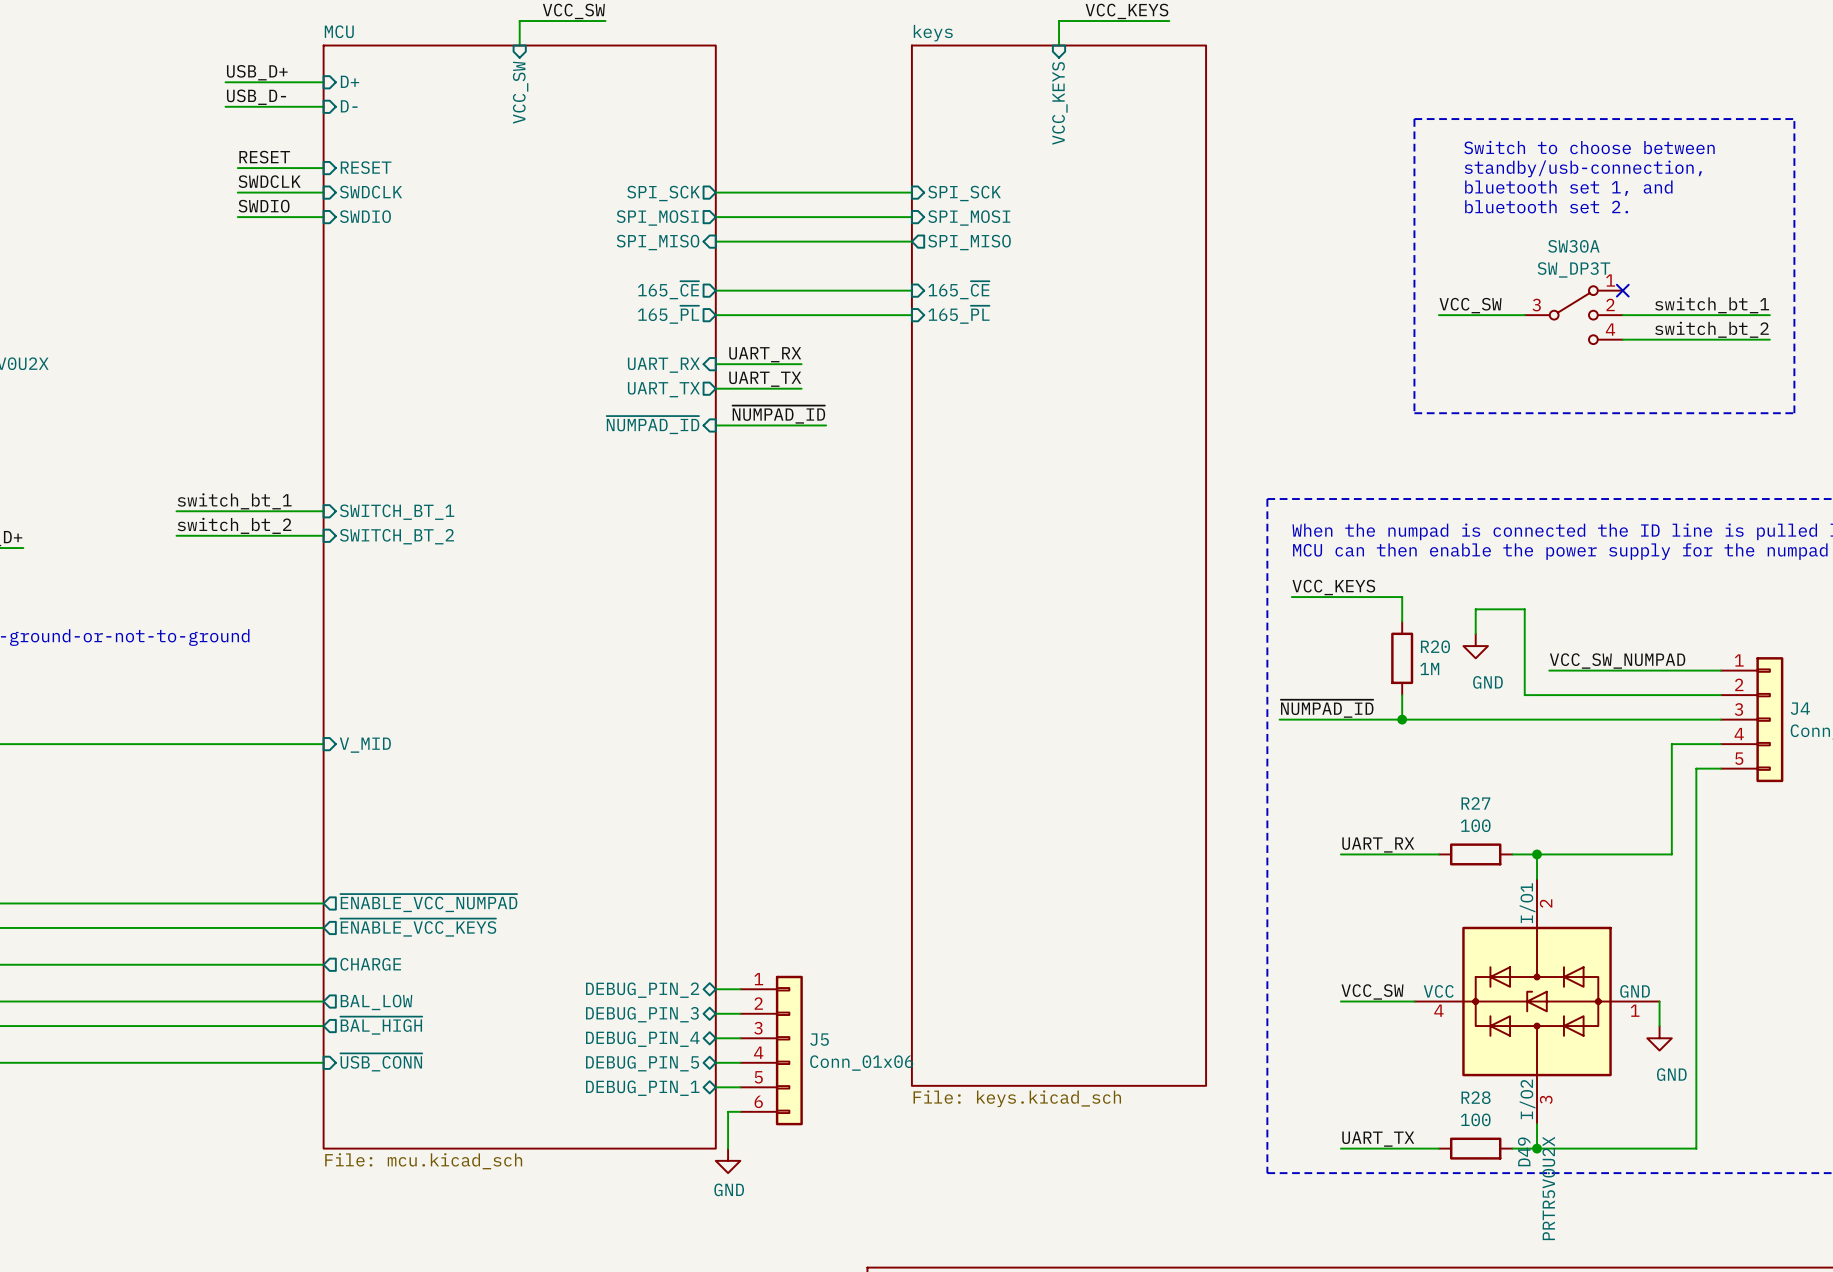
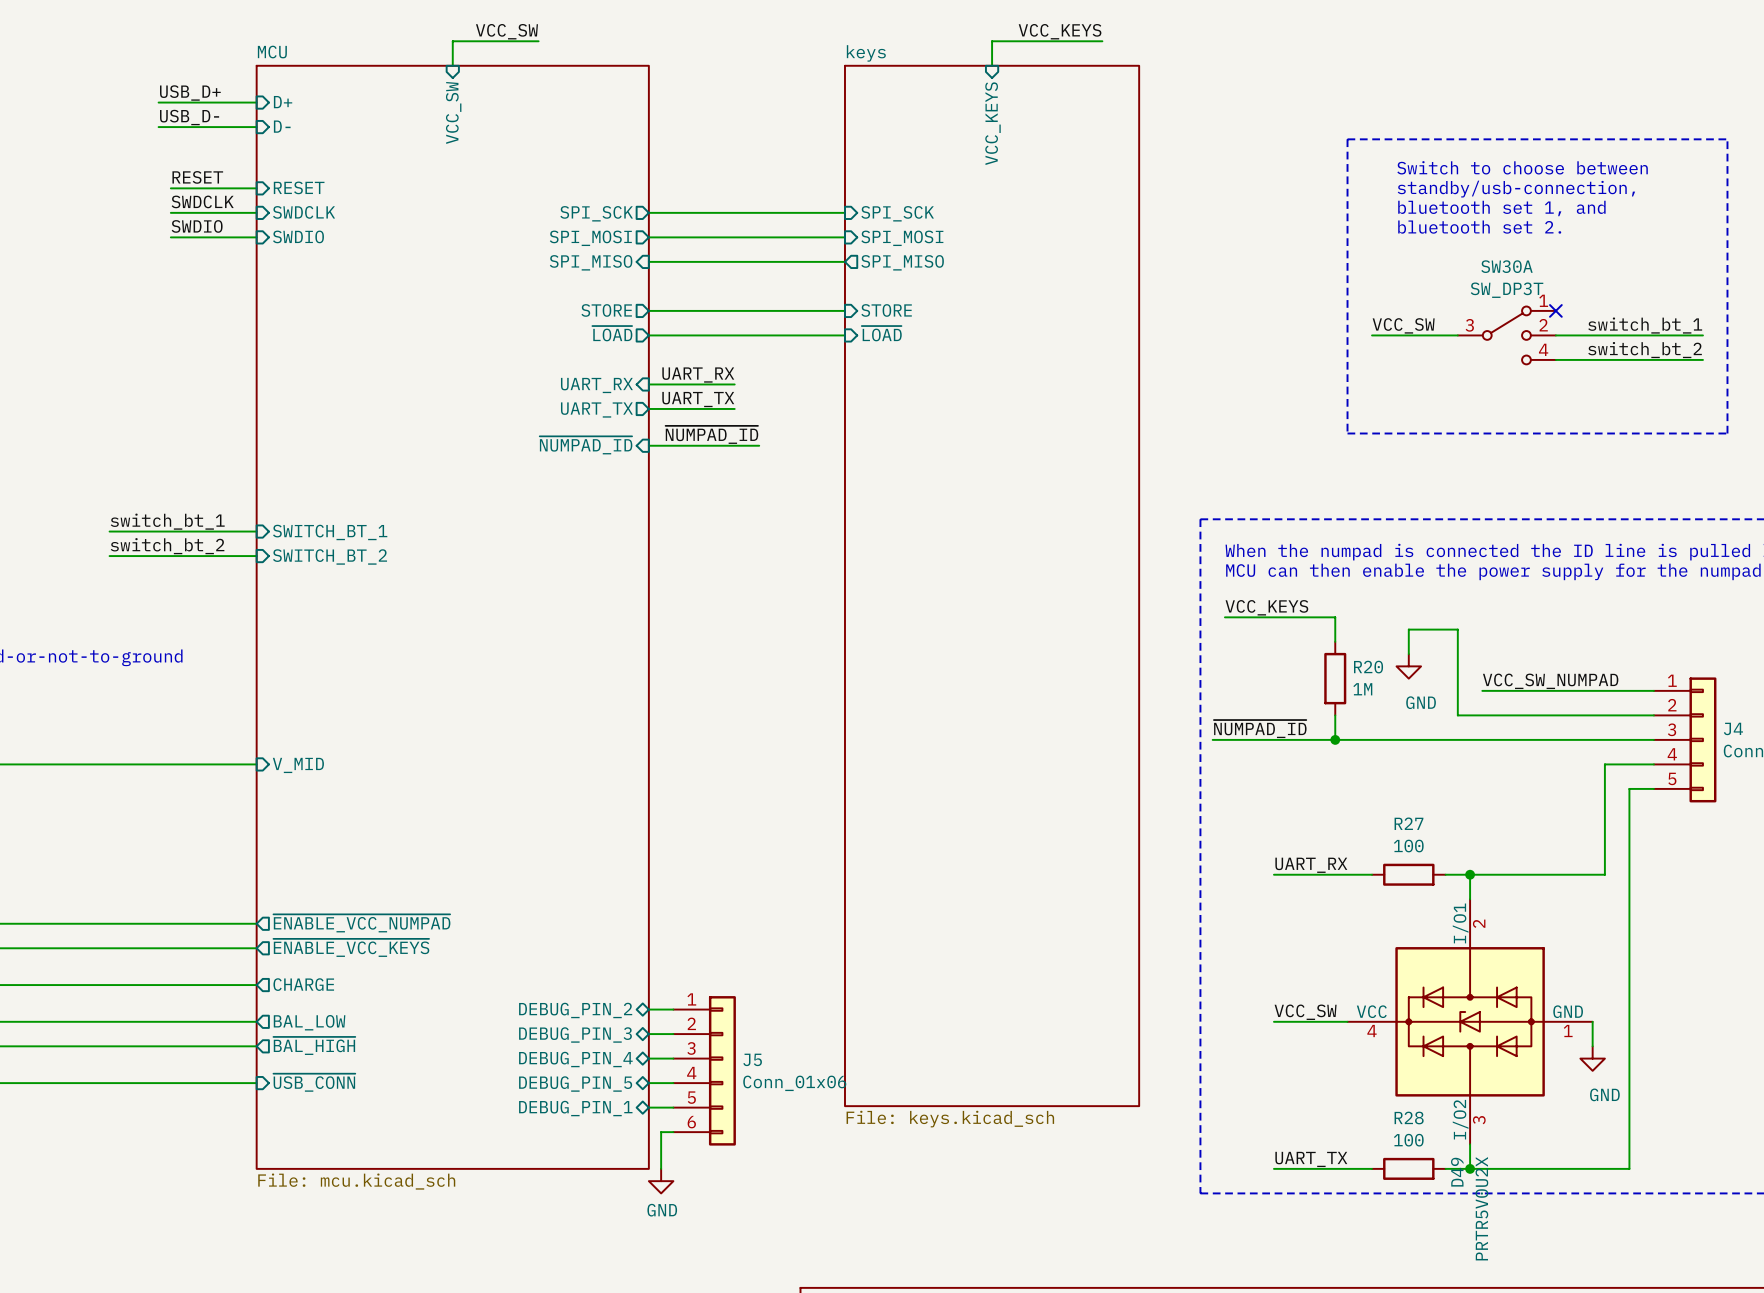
sheet pin: 165_~{CE} (668, 290) -> STORE (606, 310)
sheet pin: 165_~{CE} (958, 290) -> STORE (886, 310)
sheet pin: 165_~{PL} (668, 314) -> ~{LOAD} (612, 333)
sheet pin: 165_~{PL} (958, 314) -> ~{LOAD} (881, 333)

